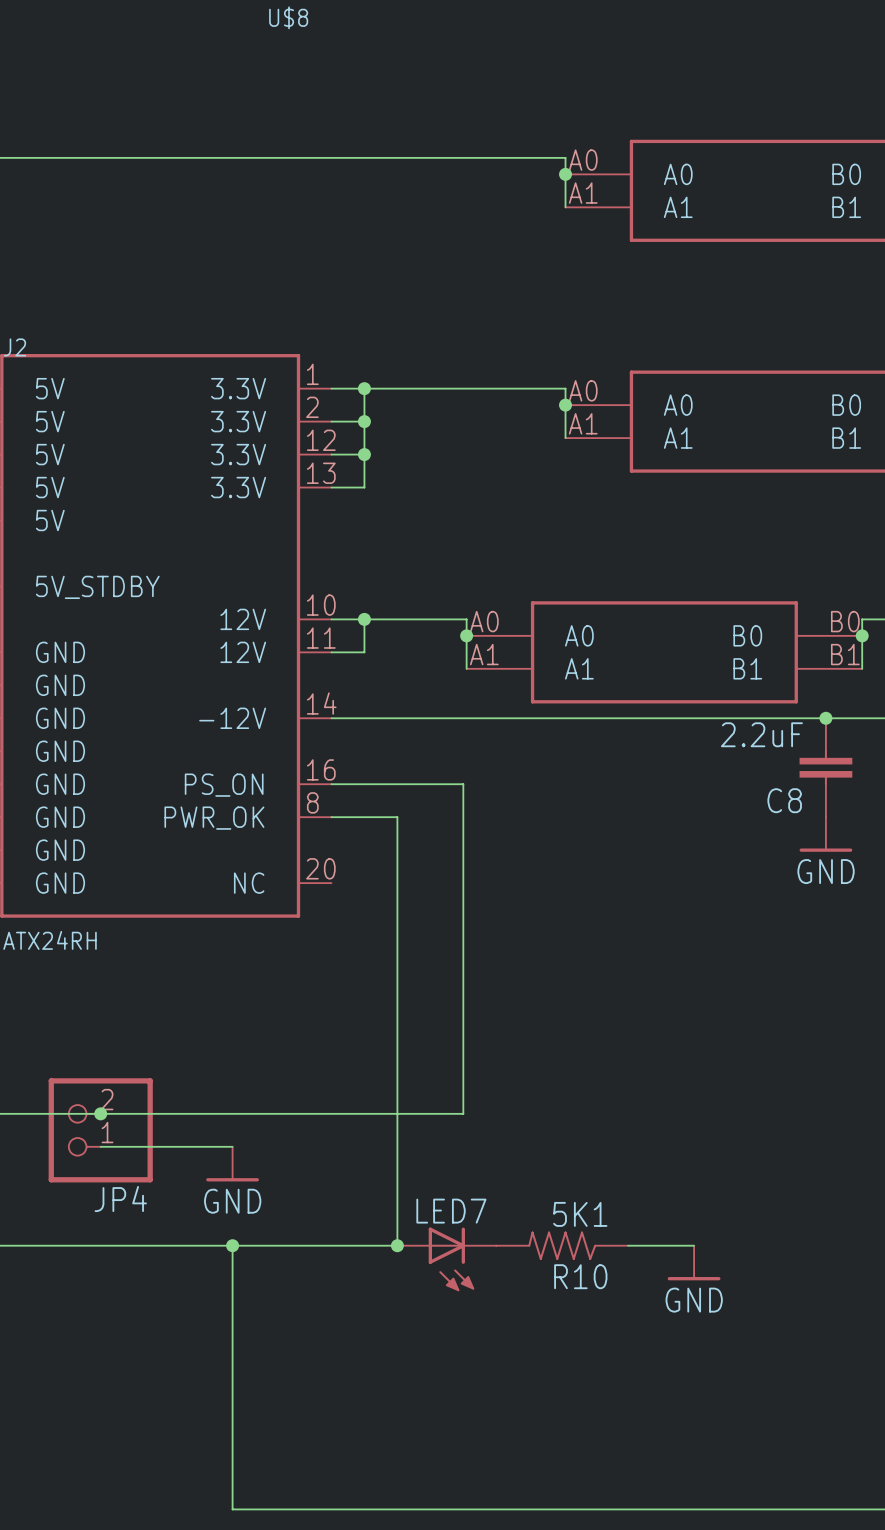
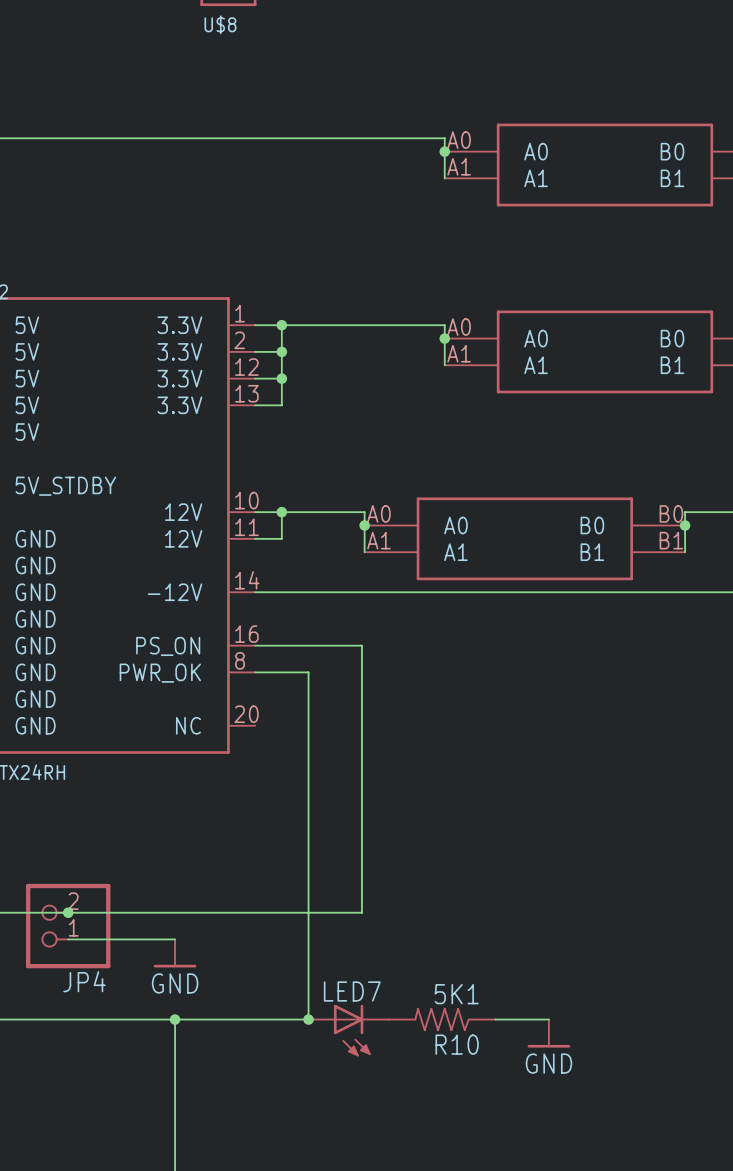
junction: (825, 718) -> none
C8: 2.2uF (825, 767) -> none
power symbol: GND (825, 834) -> none

